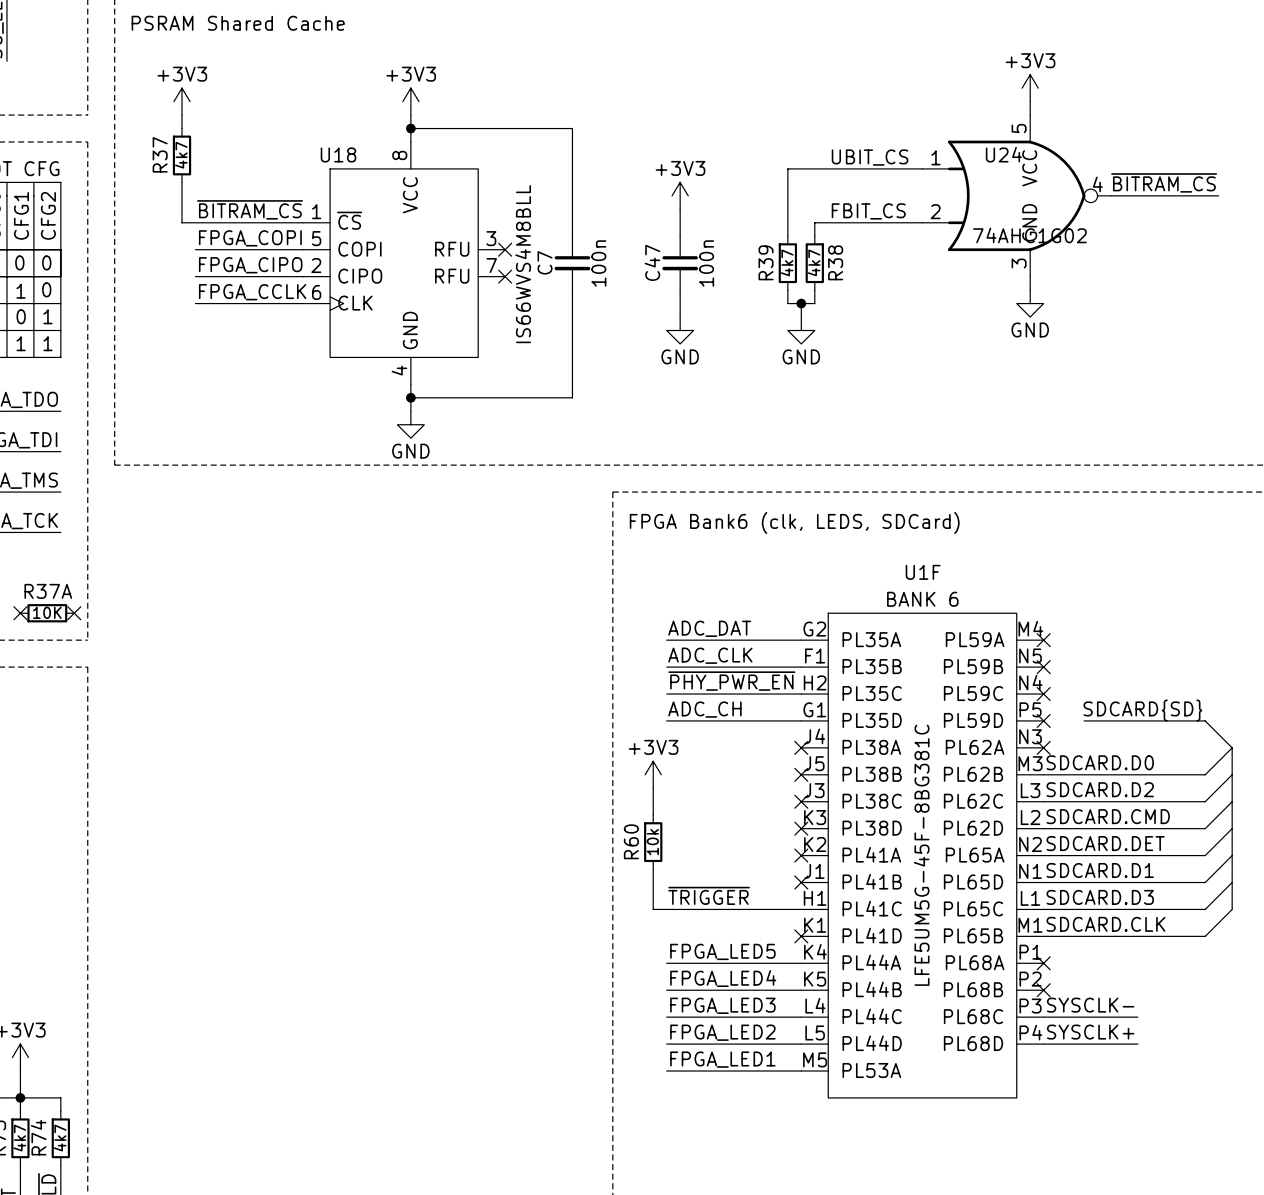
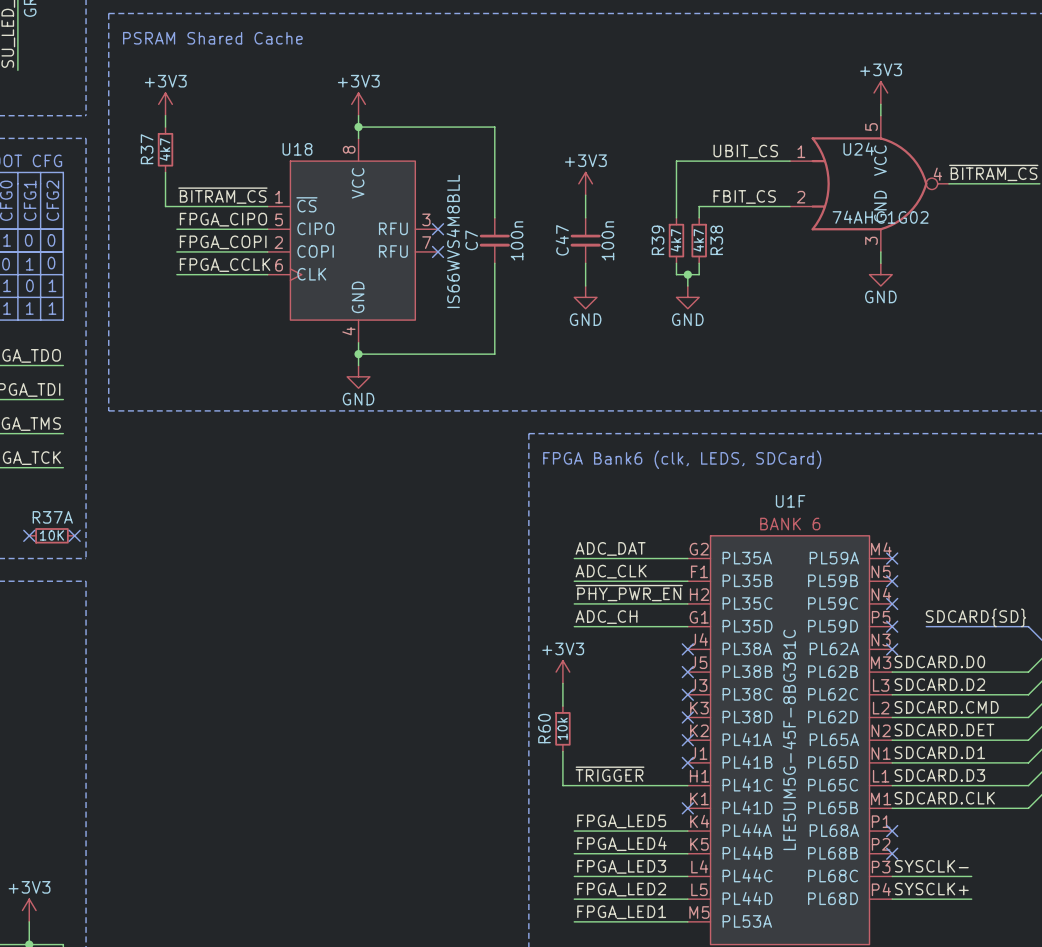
label: FPGA_COPI (250, 238) -> FPGA_CIPO (223, 219)
U18 pin name: COPI (359, 249) -> CIPO (315, 228)
label: FPGA_CIPO (250, 265) -> FPGA_COPI (223, 242)
U18 pin name: CIPO (360, 276) -> COPI (315, 251)

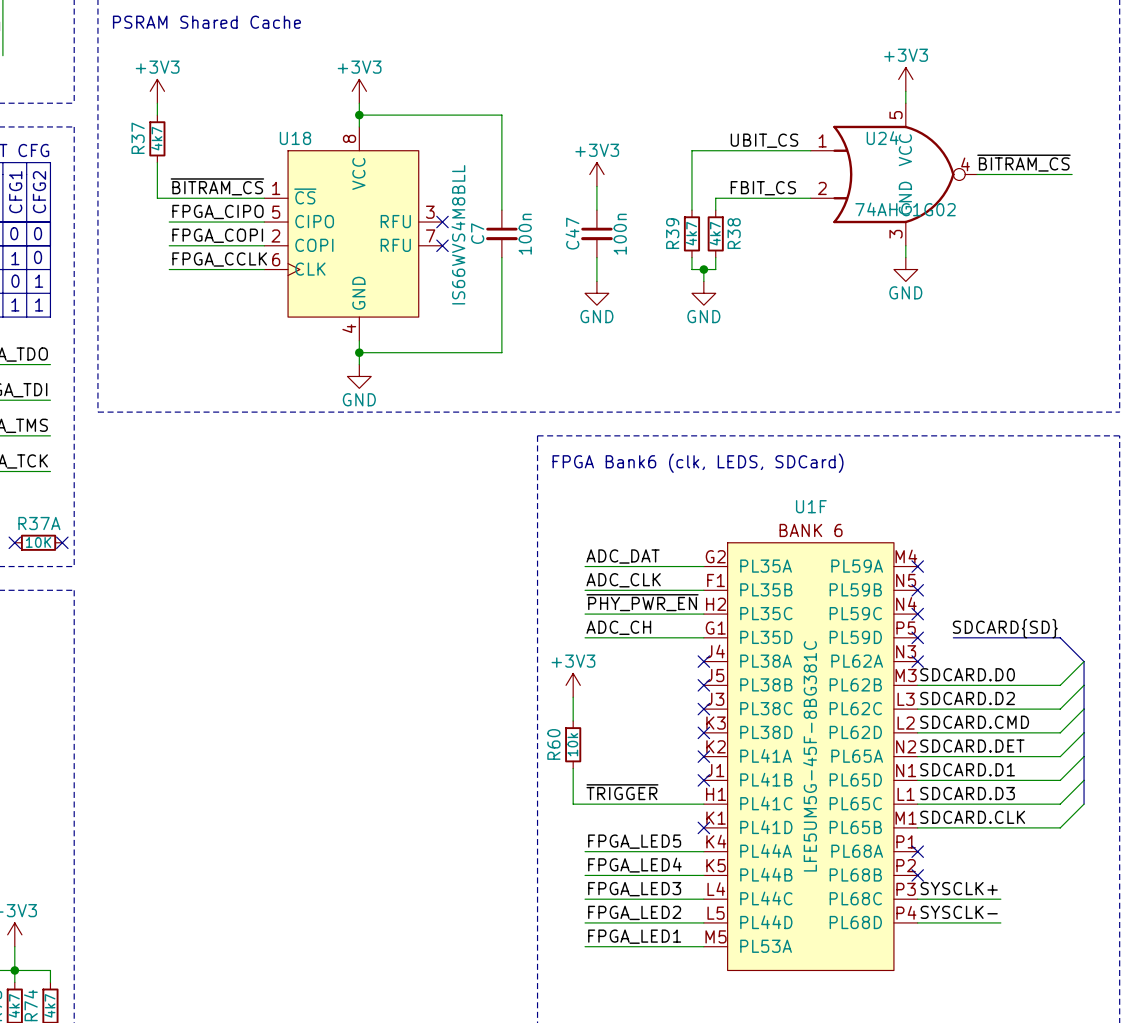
label: SYSCLK- (931, 866) -> SYSCLK+ (959, 888)
label: SYSCLK+ (931, 889) -> SYSCLK- (959, 912)

